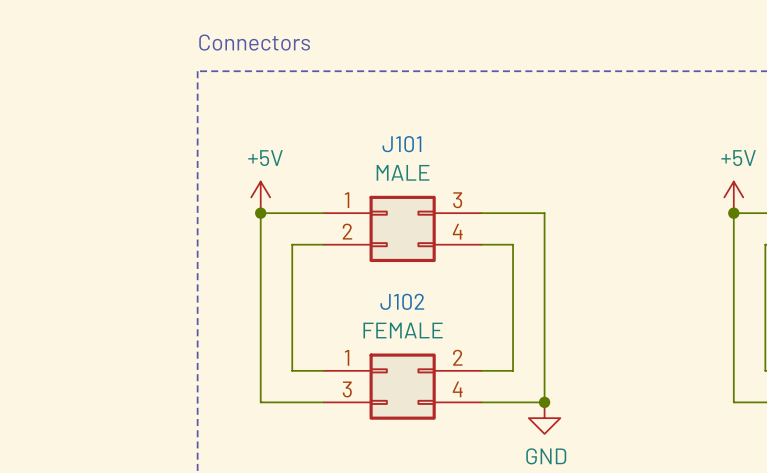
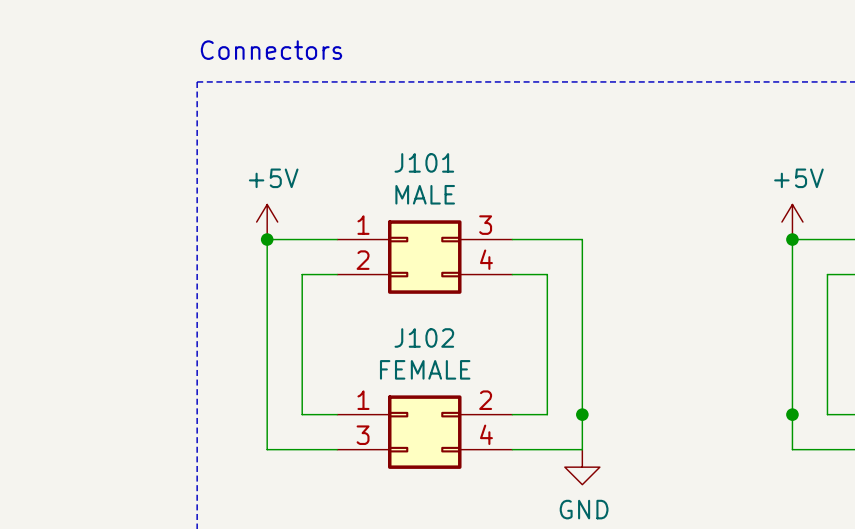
junction: none -> (792, 414)
junction position: (544, 402) -> (582, 414)

